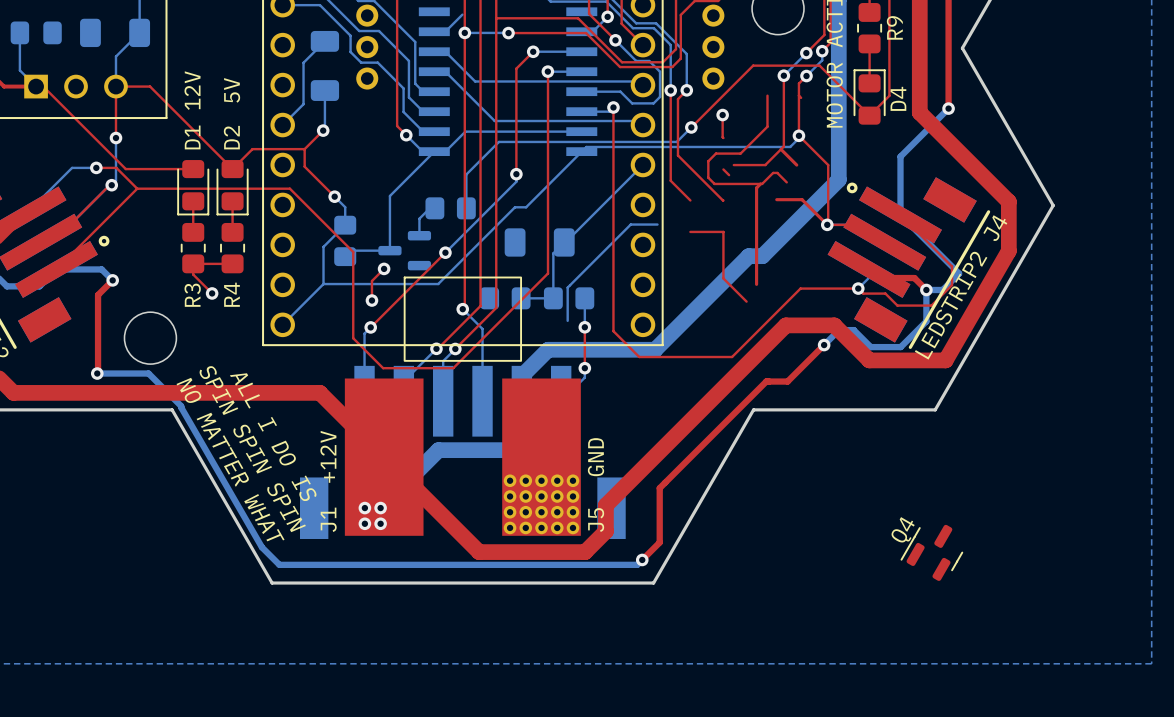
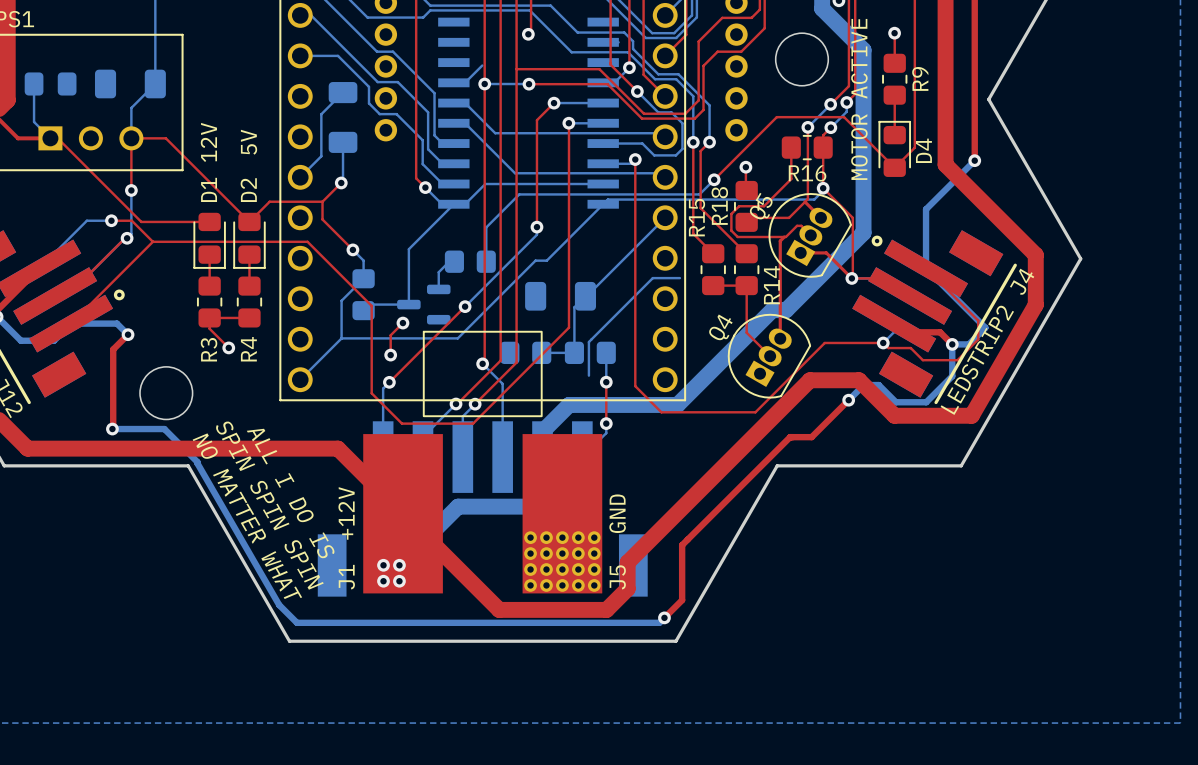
R16: none -> (807, 147)
R18: none -> (746, 206)
Q5: none -> (810, 235)
R15: none -> (713, 269)
R14: none -> (746, 269)
Q4 footprint: [900, 524, 964, 581] -> [727, 313, 812, 399]

